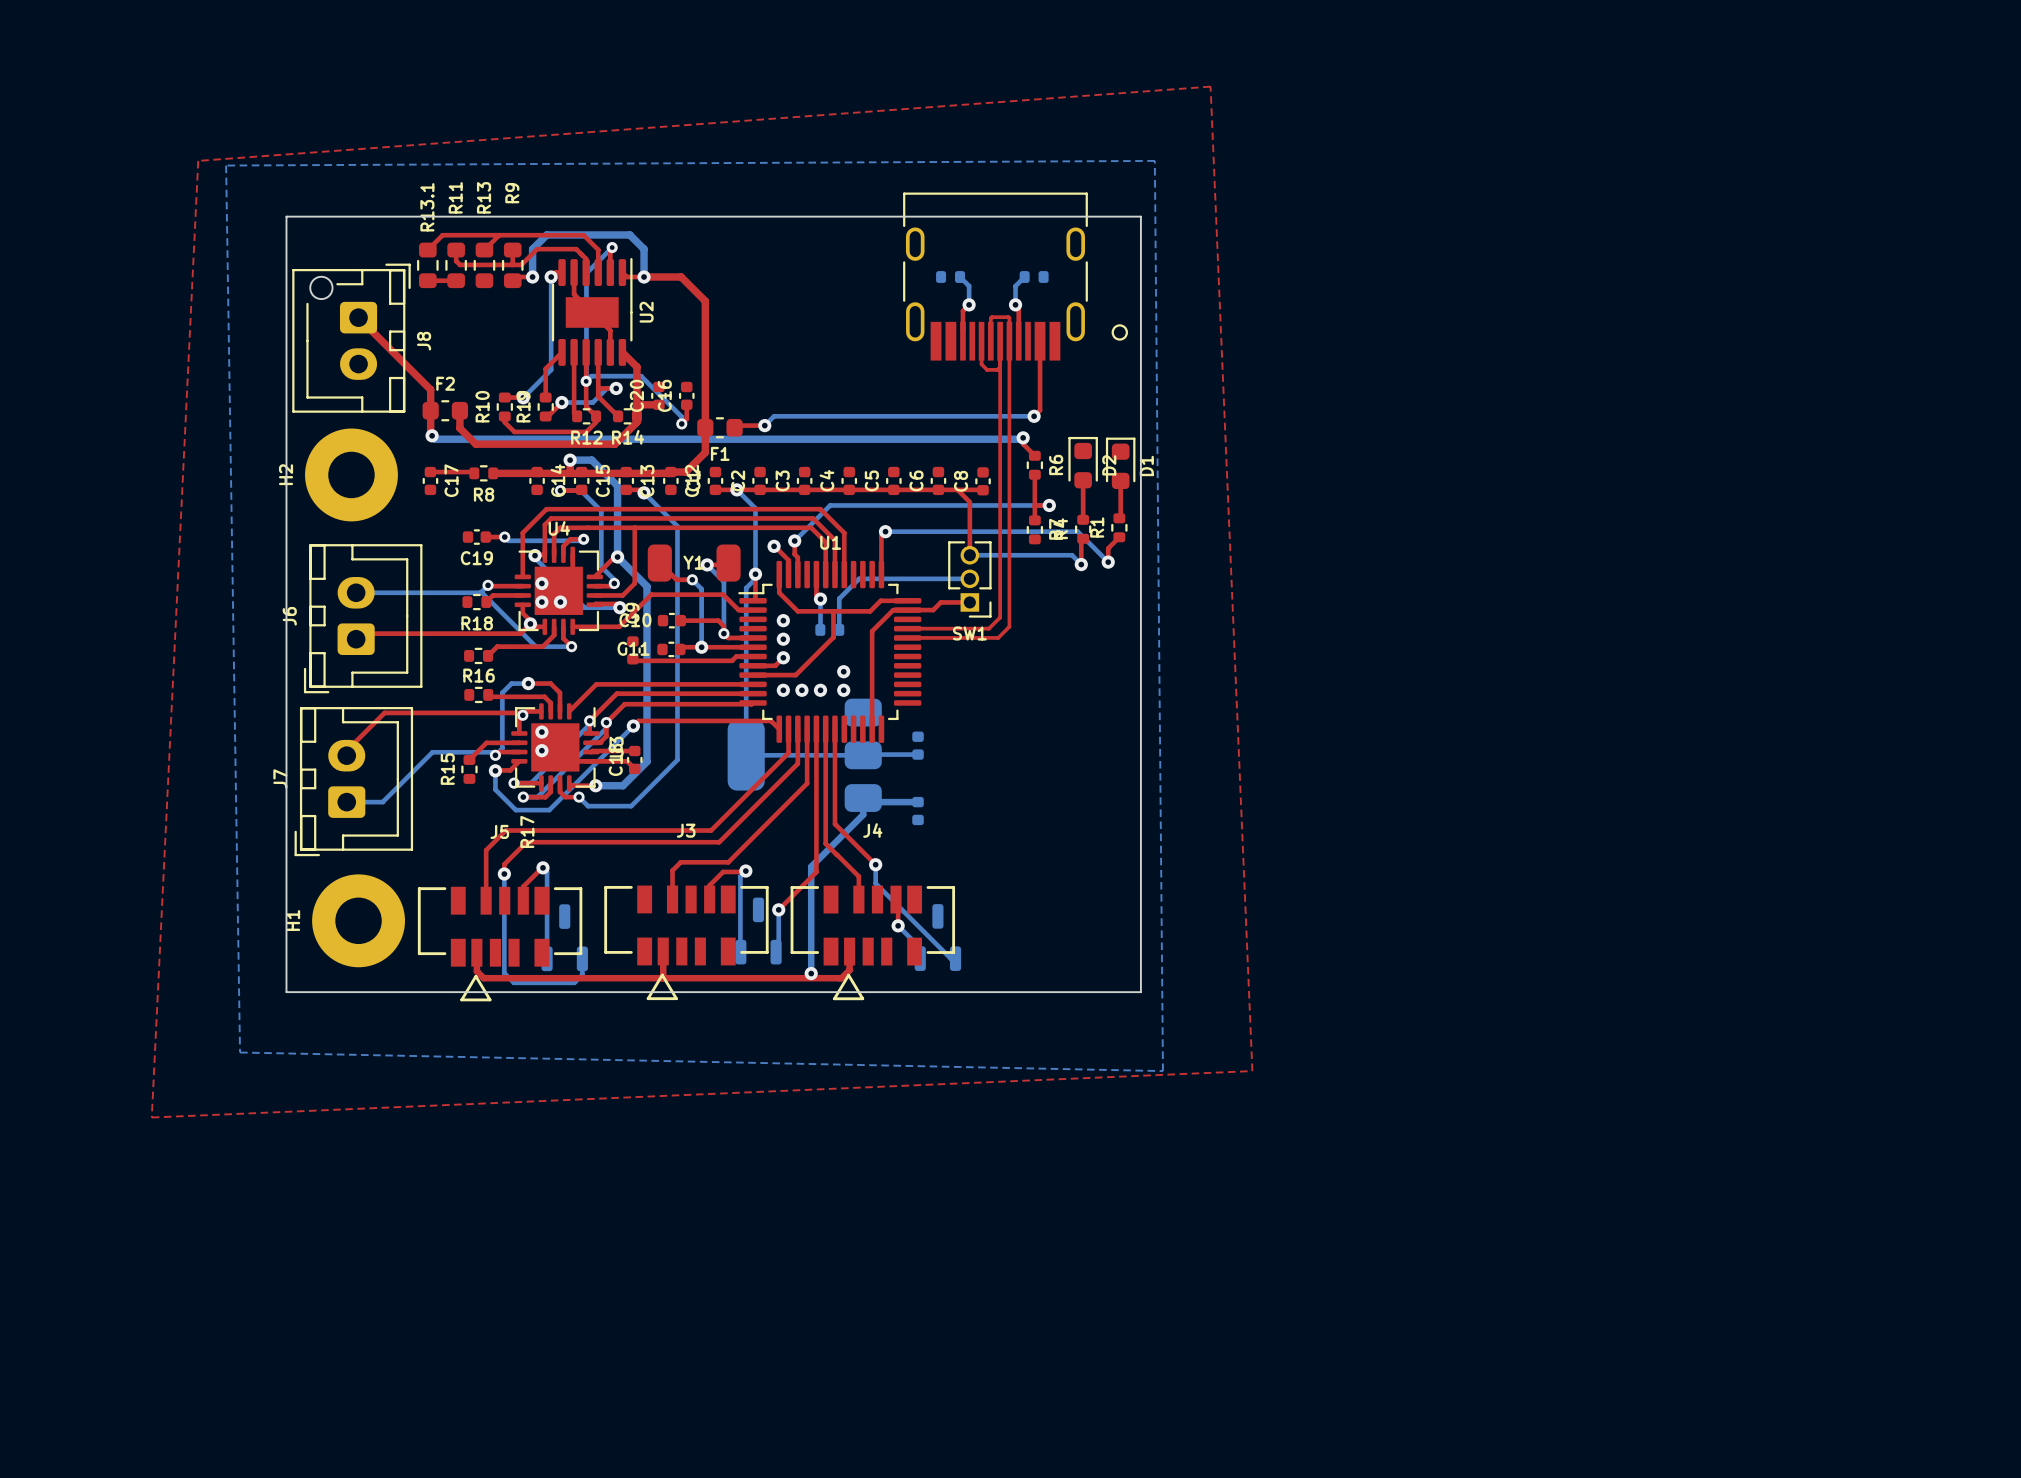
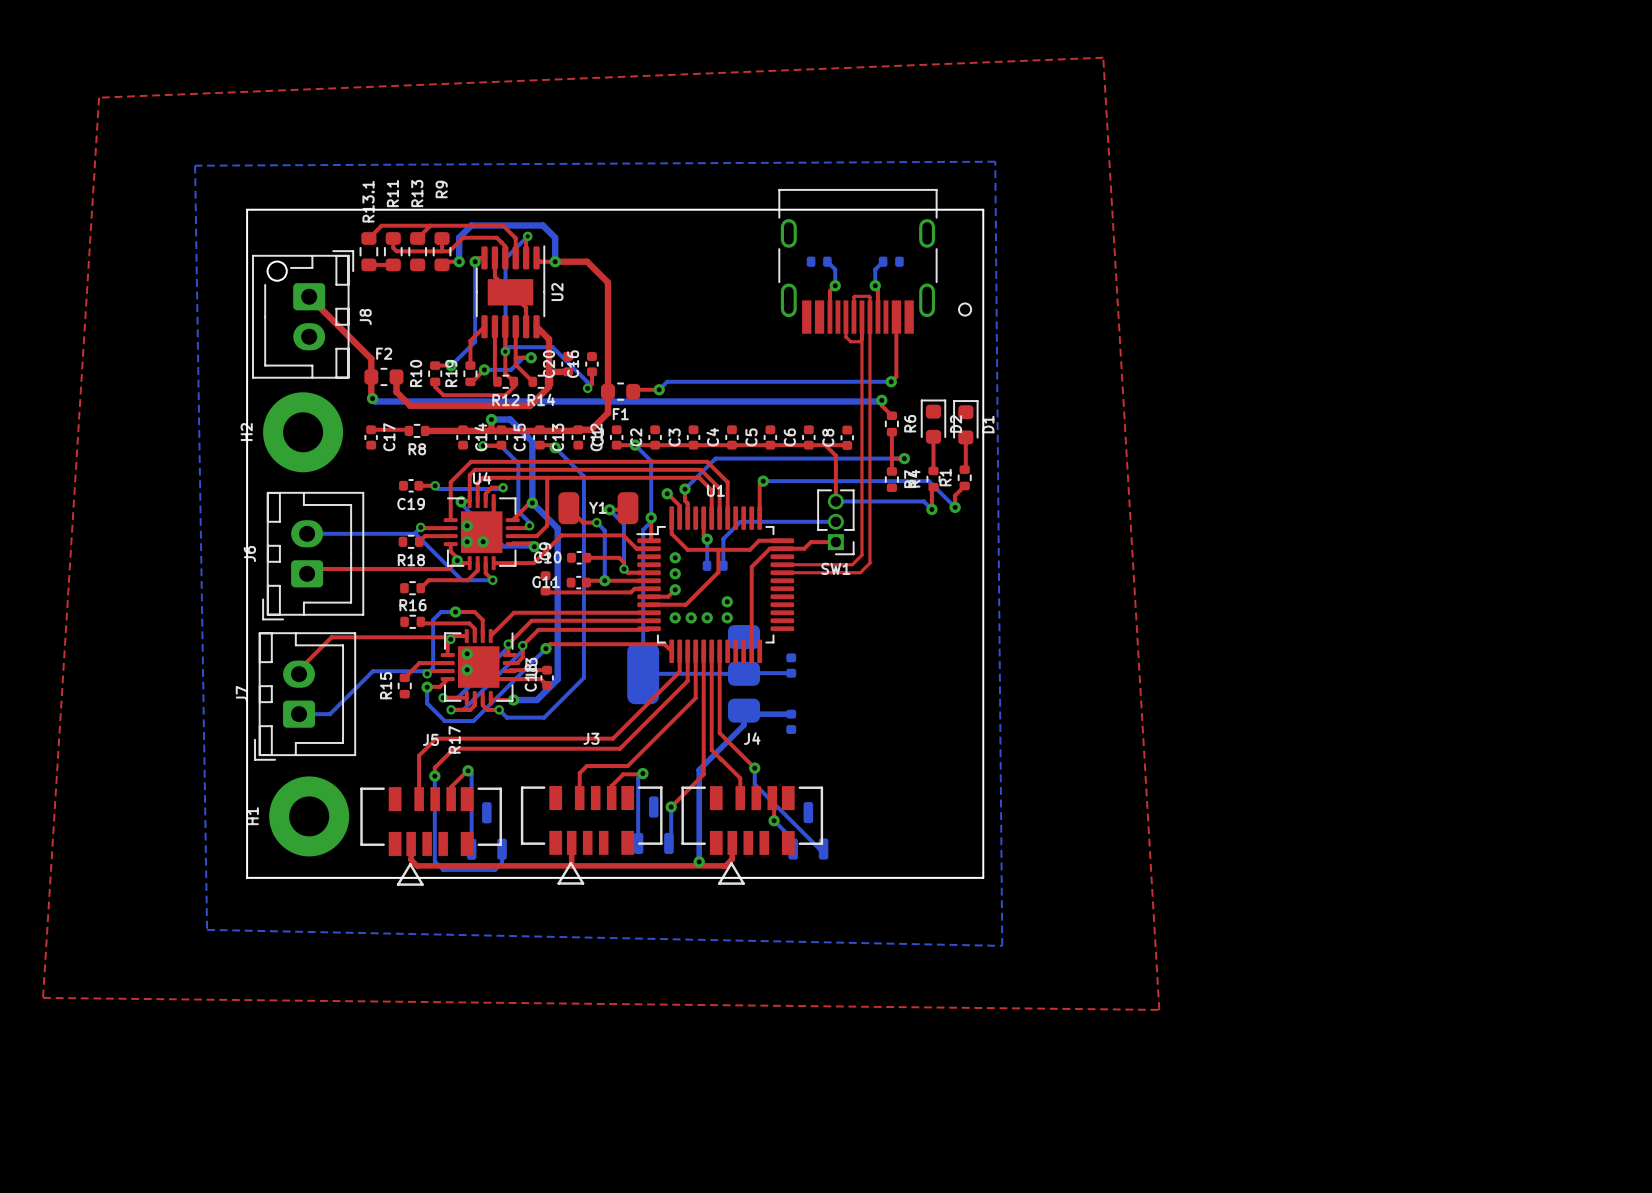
top zone outline: (1210, 86) (1252, 1071) (151, 1117) (198, 160) (1210, 86) -> (1103, 57) (99, 97) (43, 997) (1159, 1009) (1103, 57)

